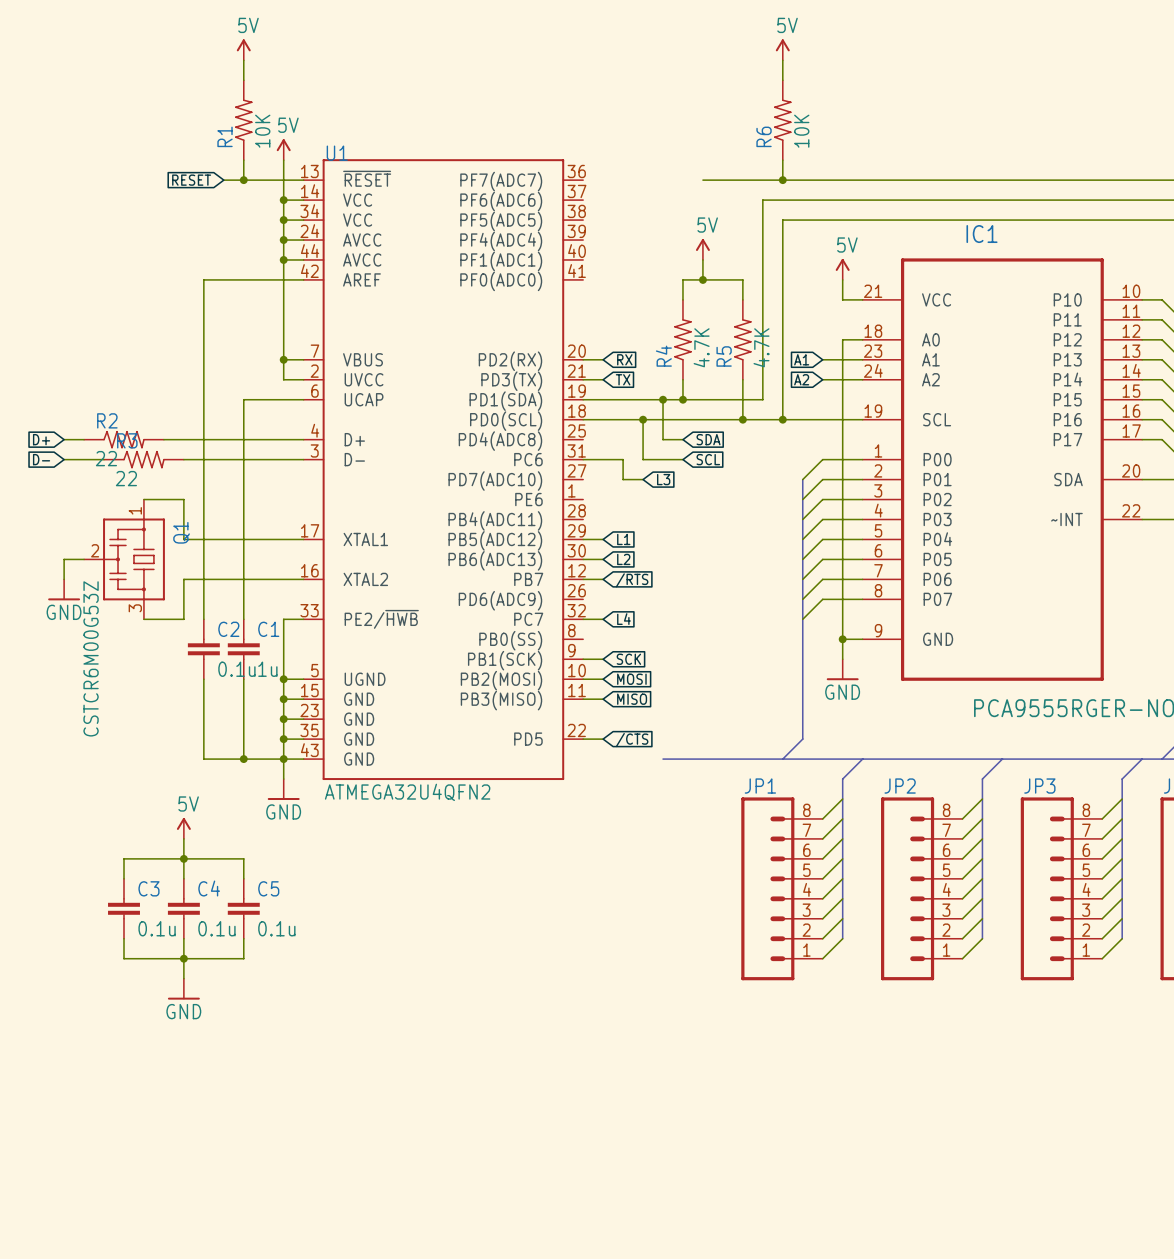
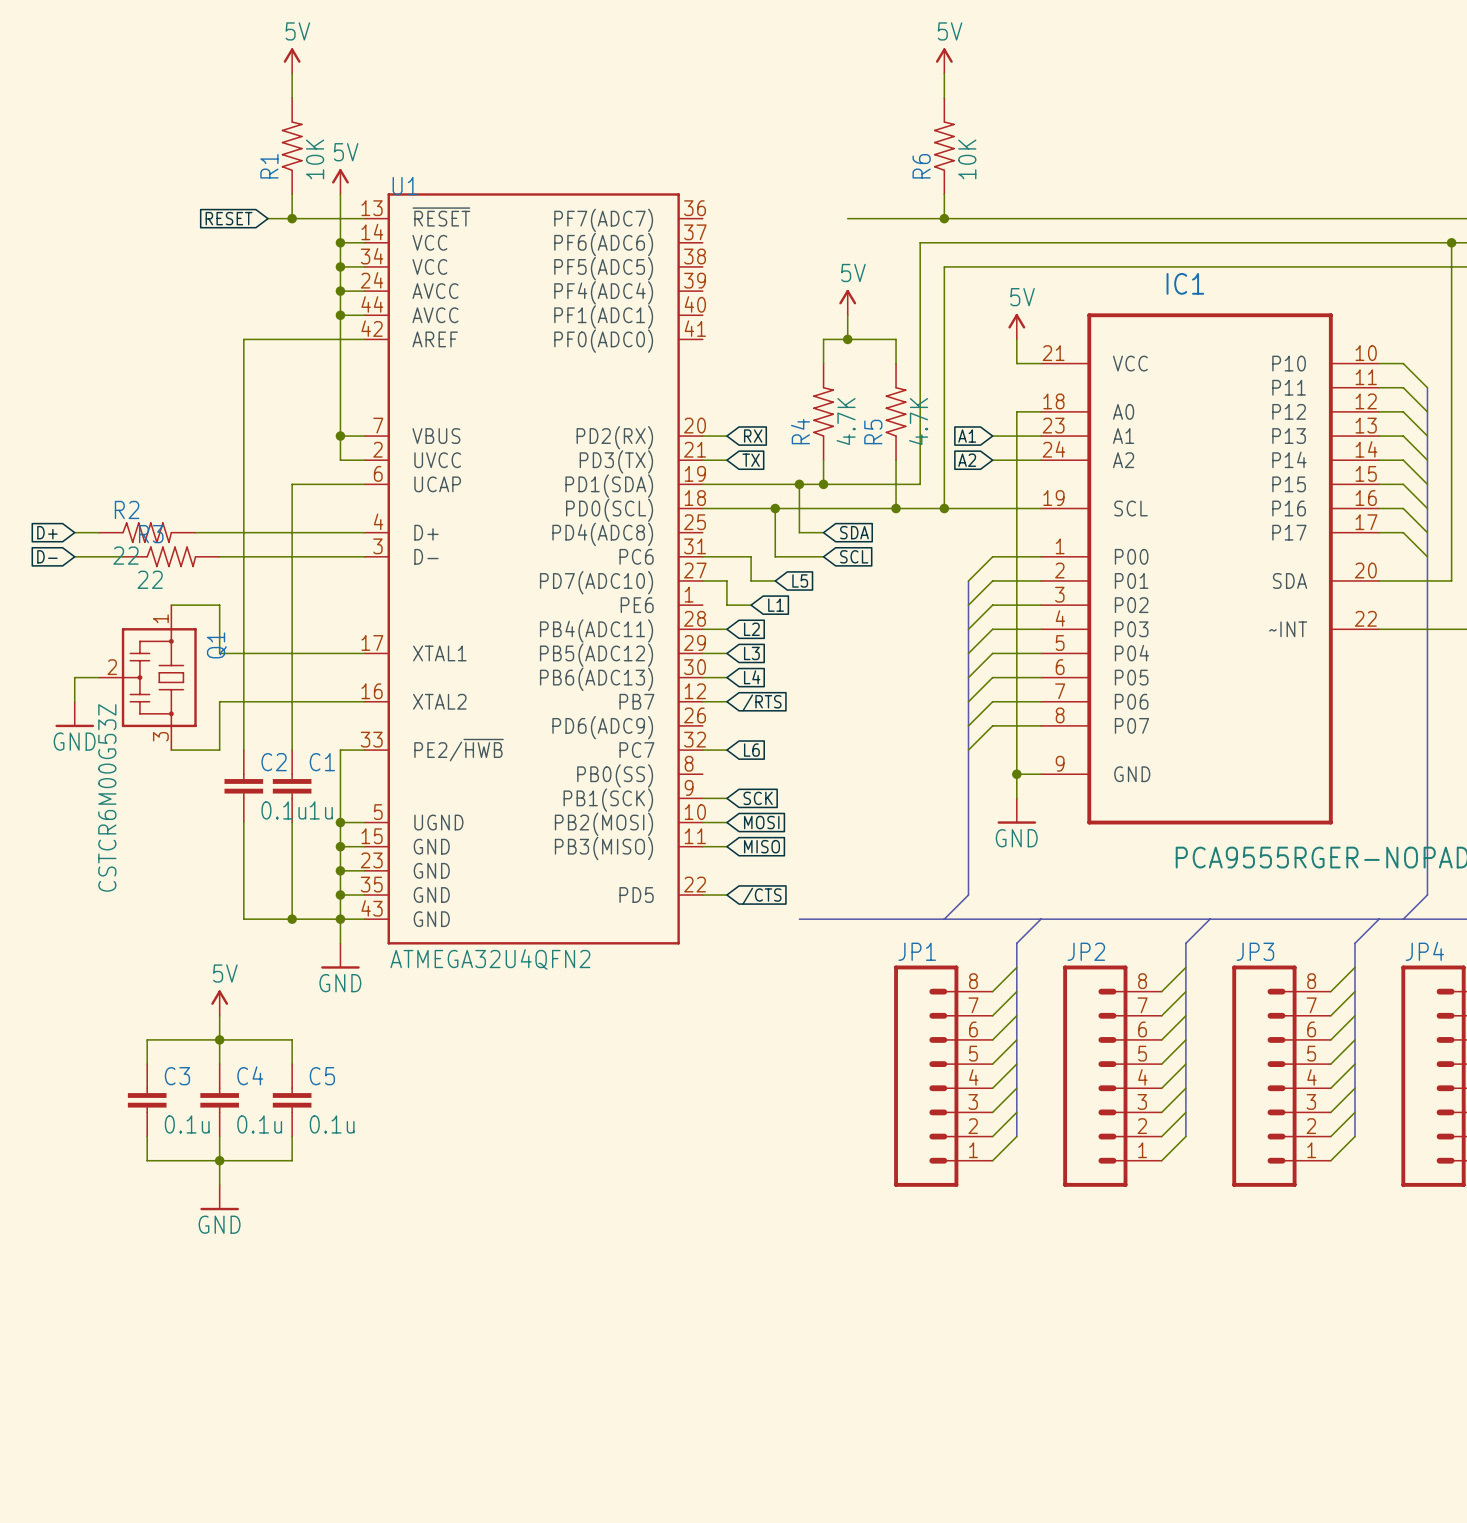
wire: none -> (702, 580) (726, 580) (726, 605) (751, 605)
global label: L3 (663, 479) -> L5 (800, 580)
global label: none -> L1 (776, 605)
wire: none -> (702, 629) (726, 629)
global label: none -> L2 (751, 629)
global label: L1 (623, 539) -> L3 (751, 653)
global label: L2 (623, 559) -> L4 (752, 677)
global label: L4 (623, 619) -> L6 (751, 750)

